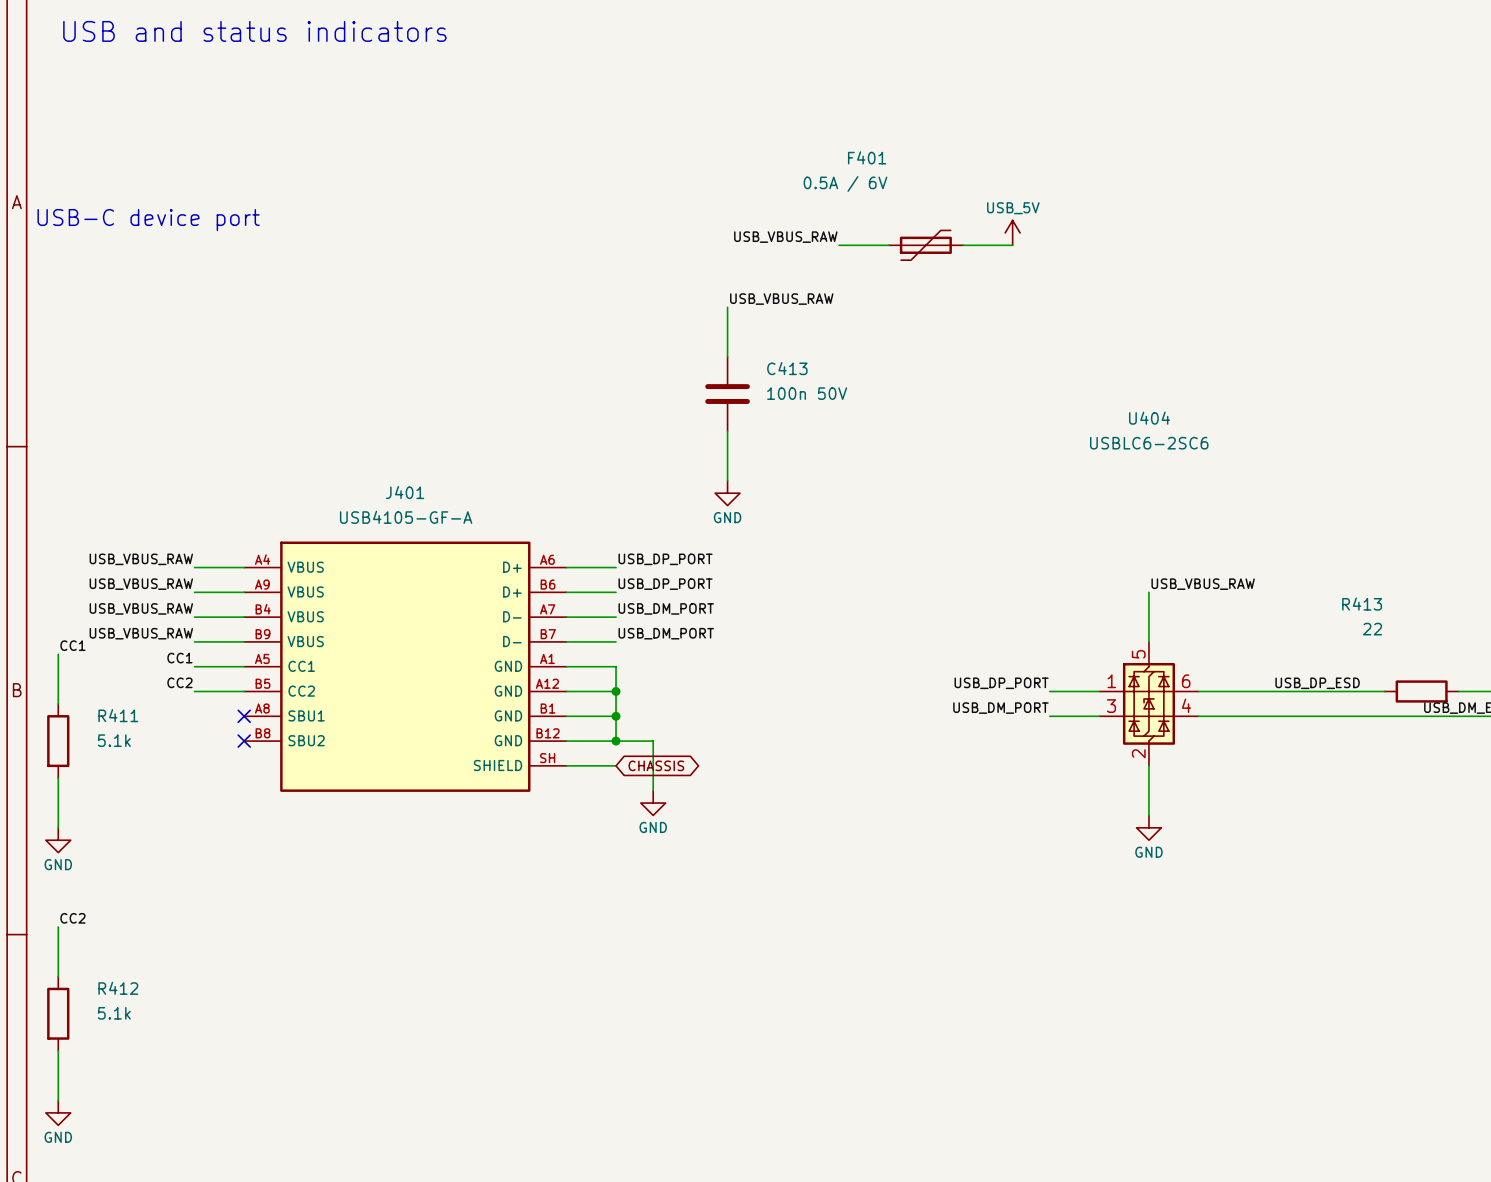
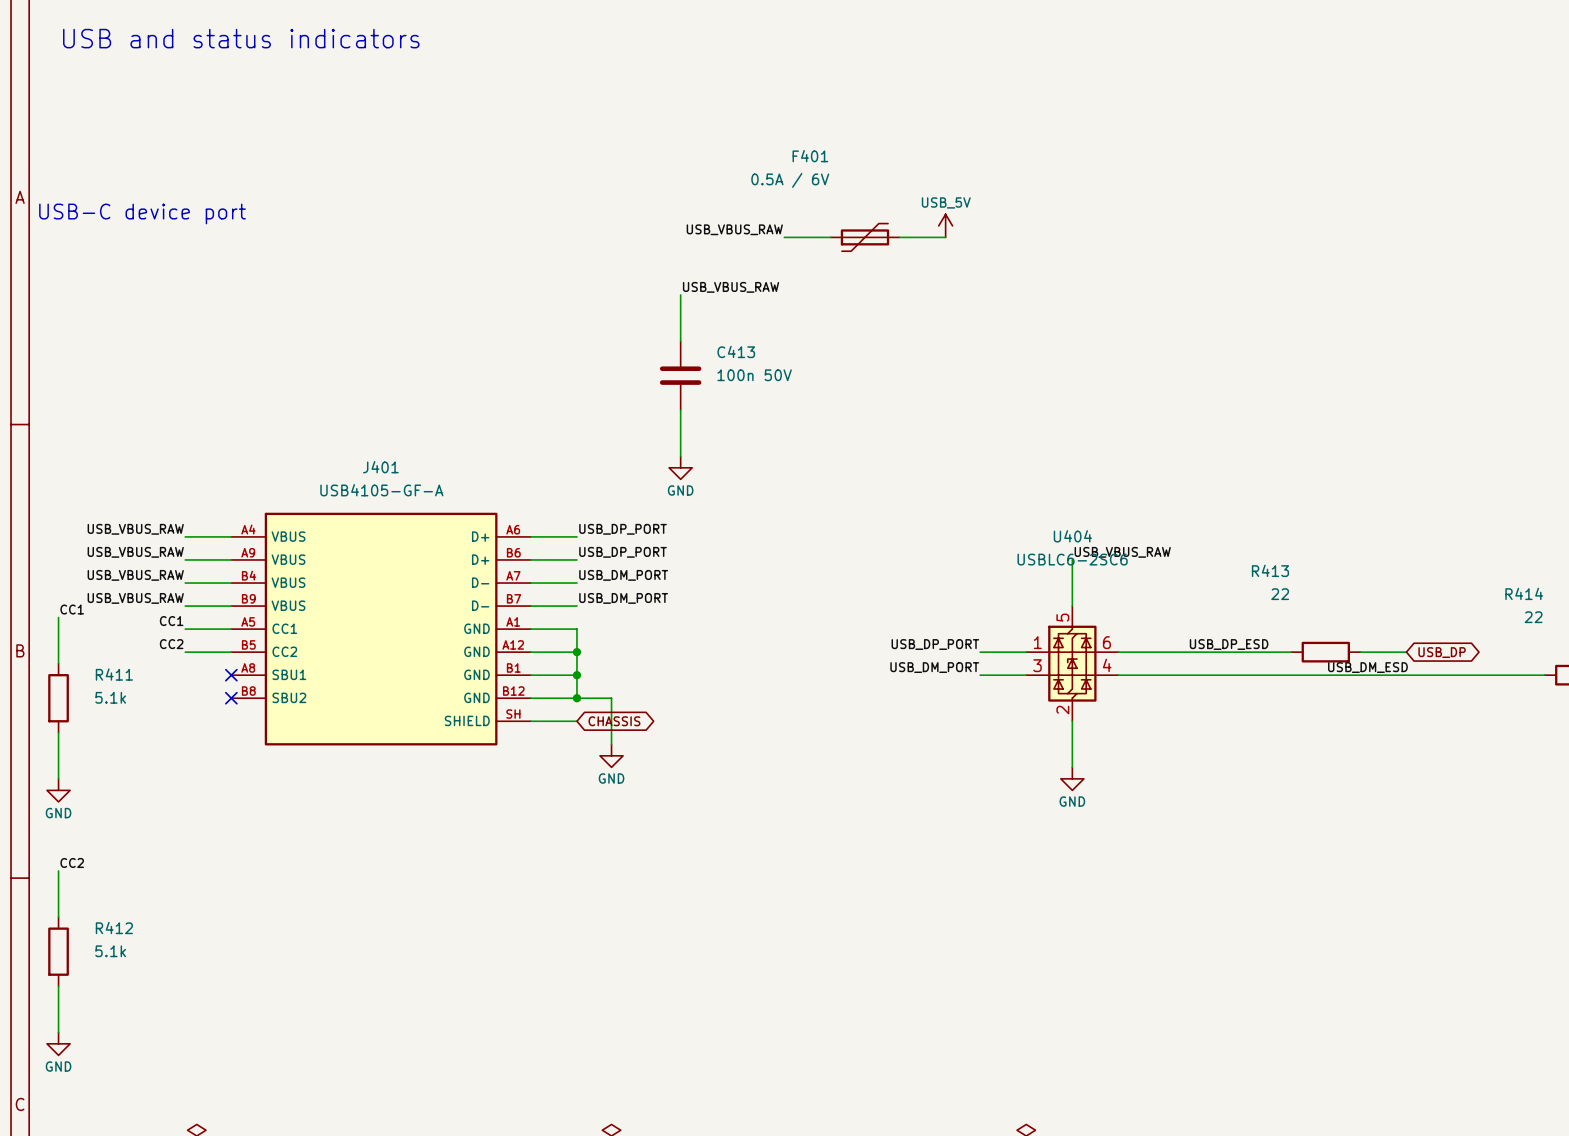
U404 name position: U404 (1149, 418) -> U404 (1072, 536)
U404 value position: USBLC6-2SC6 (1149, 443) -> USBLC6-2SC6 (1072, 559)

